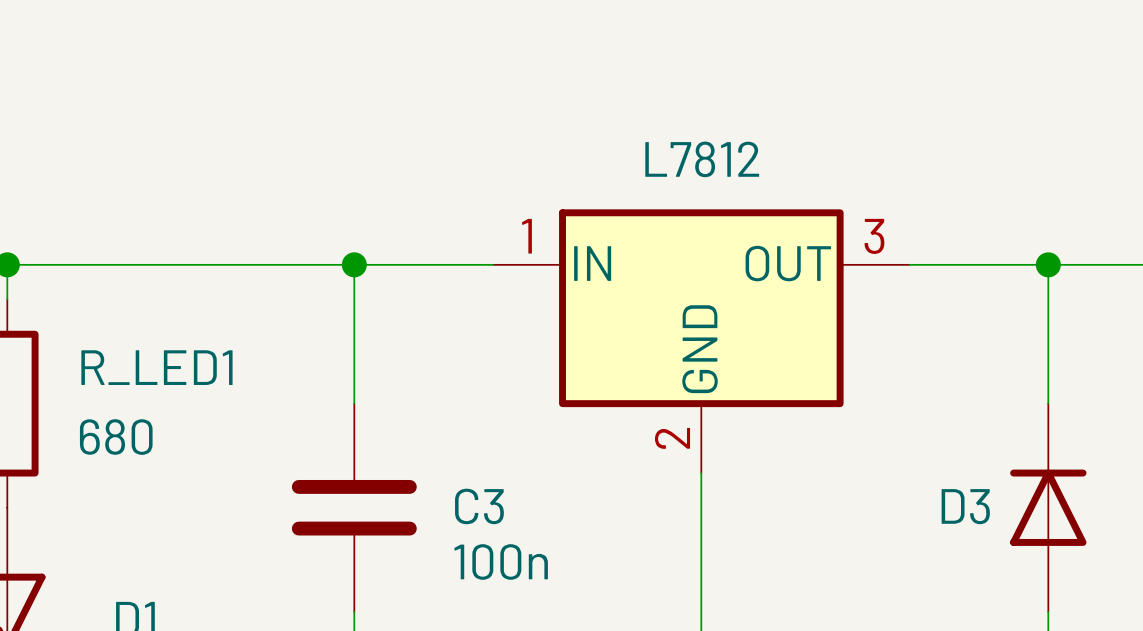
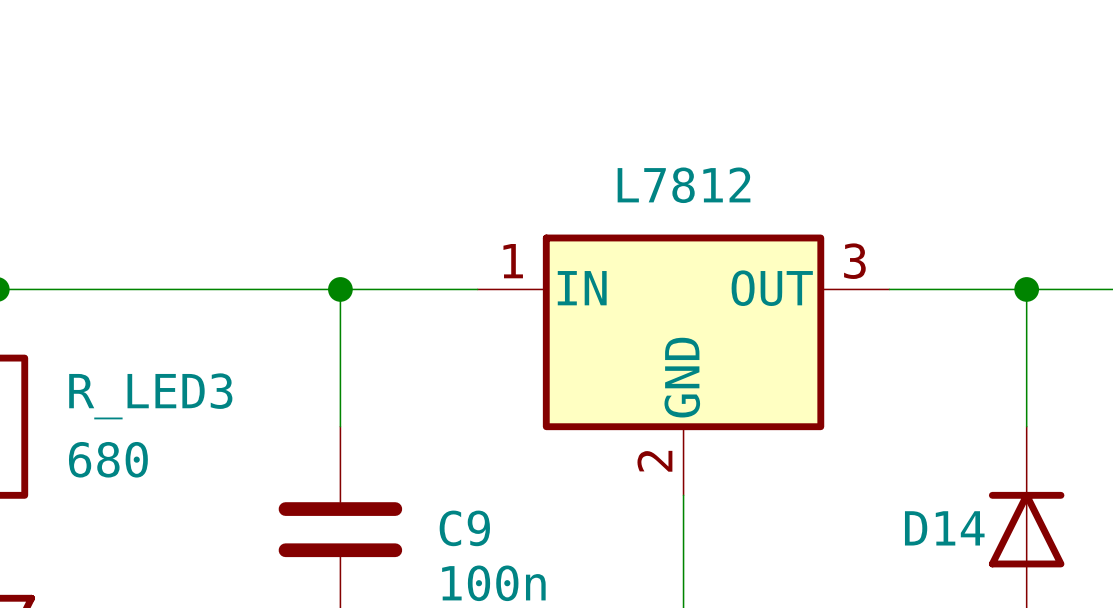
R_LED1 name: R_LED1 (156, 367) -> R_LED3 (150, 396)
C3 name: C3 (479, 506) -> C9 (464, 528)
D3 name: D3 (965, 506) -> D14 (944, 528)

